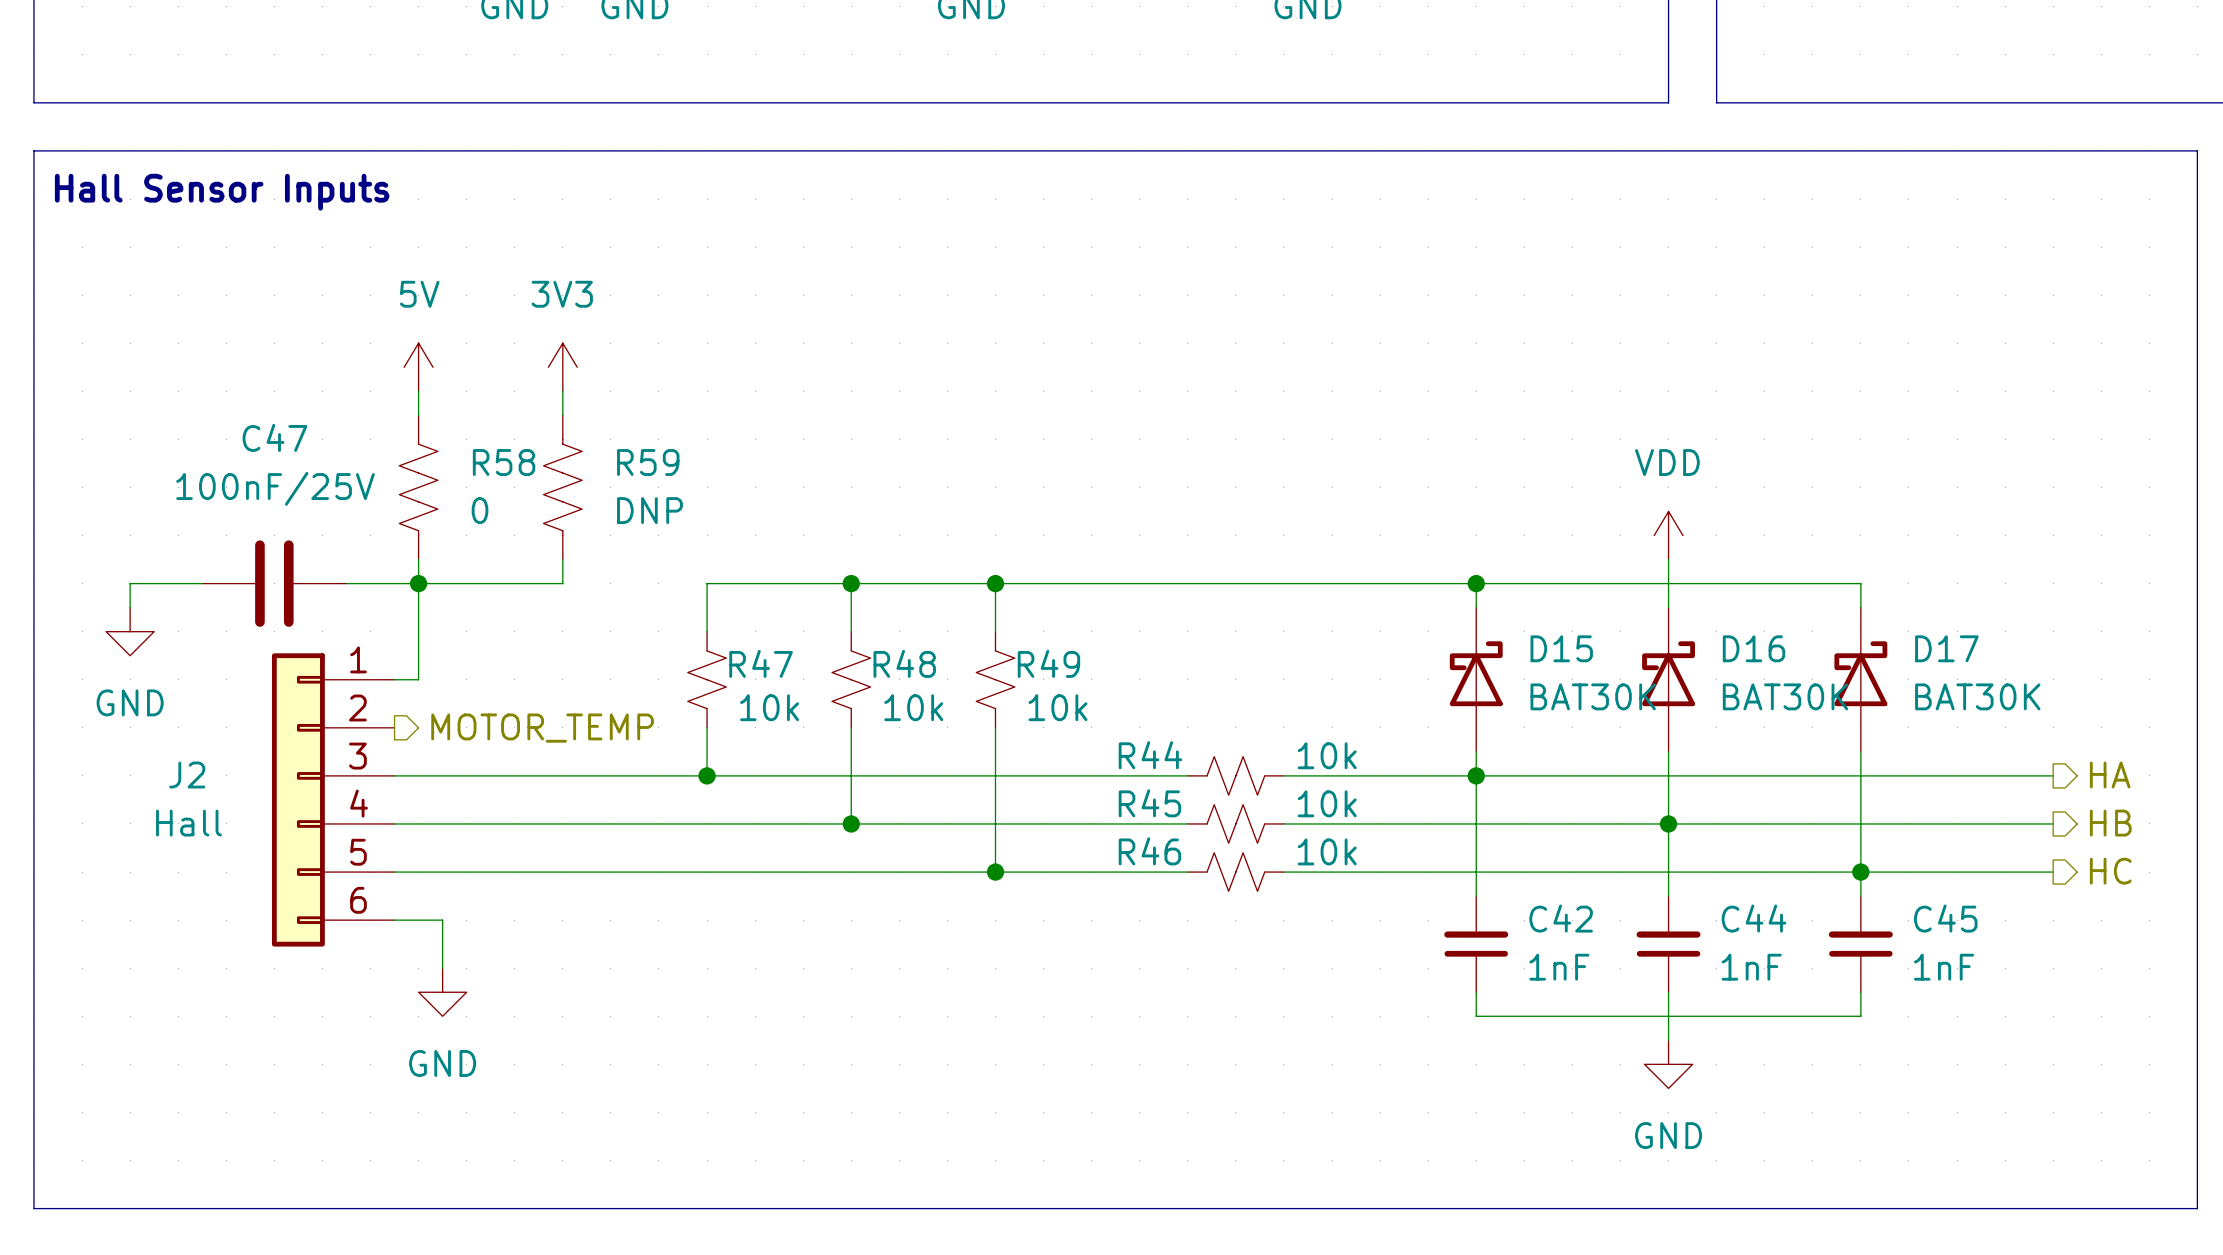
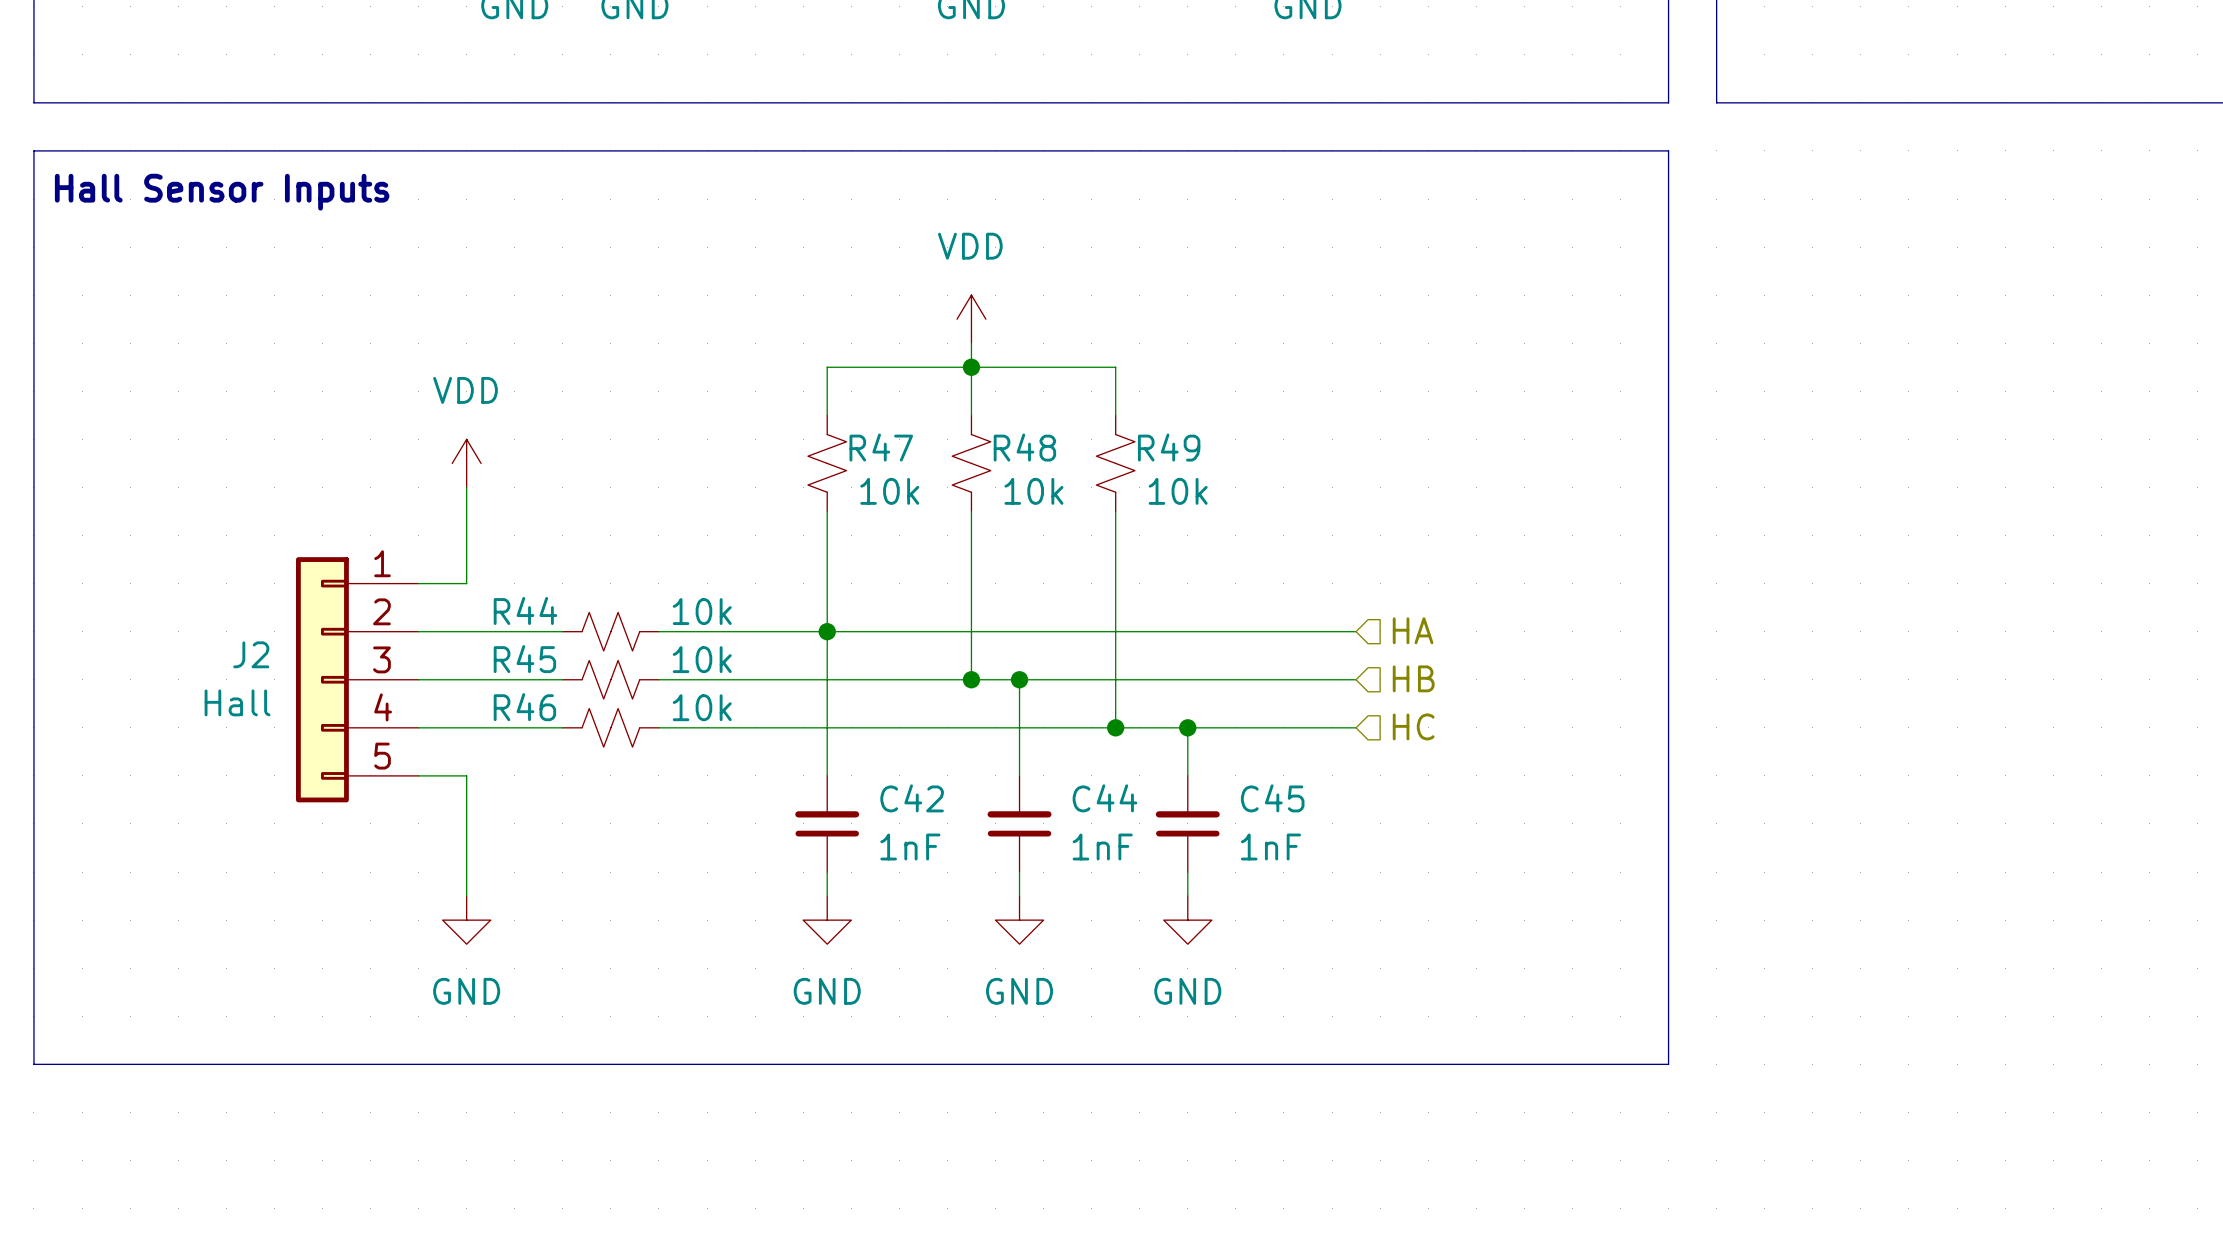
line: (1668, 150) (2197, 150) (2197, 1208) (33, 1208) (33, 1064) -> (1668, 150) (1668, 1064) (33, 1064)
power symbol: none -> VDD (971, 319)
wire: none -> (971, 343) (971, 415)
power symbol: 5V (418, 367) -> none
power symbol: 3V3 (562, 367) -> none
junction: none -> (971, 367)
wire: (418, 391) (418, 415) -> none
wire: (562, 391) (562, 415) -> none
wire: none -> (827, 415) (827, 367) (1115, 367) (1115, 415)
power symbol: none -> VDD (466, 463)
R58: 0 (418, 487) -> none
R59: DNP (562, 487) -> none
wire: none -> (827, 511) (827, 775)
wire: none -> (971, 511) (971, 679)
wire: none -> (1115, 511) (1115, 727)
power symbol: VDD (1668, 535) -> none
wire: (418, 559) (418, 679) (394, 679) -> none
wire: (562, 559) (562, 583) (466, 583) -> (466, 487) (466, 583)
wire: (202, 583) (130, 583) (130, 607) -> none
C47: 100nF/25V (274, 583) -> none
junction: (418, 583) -> none
wire: (851, 583) (851, 631) -> none
junction position: (851, 583) -> (827, 631)
wire: (995, 583) (995, 631) -> none
junction: (995, 583) -> none
wire: (1476, 583) (1476, 607) -> none
junction: (1476, 583) -> none
wire: (1860, 607) (1860, 583) (707, 583) (707, 631) -> none
hierarchical label: none -> HA (1413, 630)
power symbol: GND (130, 631) -> none
wire: none -> (418, 631) (562, 631)
wire: none -> (658, 631) (1356, 631)
J2 symbol: [271, 653, 395, 947] -> [295, 557, 419, 803]
hierarchical label: none -> HB (1413, 678)
wire: none -> (418, 679) (562, 679)
wire: none -> (658, 679) (1356, 679)
R47 position: (707, 679) -> (827, 463)
R48 position: (851, 679) -> (971, 463)
junction: none -> (971, 679)
R49 position: (995, 679) -> (1115, 463)
junction: none -> (1019, 679)
D15: BAT30K (1476, 679) -> none
D16: BAT30K (1668, 679) -> none
D17: BAT30K (1860, 679) -> none
hierarchical label: none -> HC (1413, 726)
wire: none -> (418, 727) (562, 727)
wire: none -> (658, 727) (1356, 727)
wire: (707, 727) (707, 775) -> none
wire: (851, 727) (851, 823) -> (1019, 679) (1019, 775)
wire: (995, 727) (995, 872) -> none
junction: none -> (1115, 727)
junction: none -> (1187, 727)
hierarchical label: MOTOR_TEMP (542, 728) -> none
wire: (1476, 751) (1476, 896) -> none
wire: (1860, 751) (1860, 896) -> none
wire: (466, 775) (1187, 775) -> (1187, 727) (1187, 775)
wire: none -> (466, 775) (466, 896)
junction: (707, 775) -> none
R44 position: (1235, 775) -> (610, 631)
wire: (1283, 775) (2053, 775) -> none
junction: (1476, 775) -> none
hierarchical label: HA (2110, 775) -> none
wire: (394, 823) (1187, 823) -> none
junction: (851, 823) -> none
R45 position: (1235, 823) -> (610, 679)
wire: (1283, 823) (2053, 823) -> none
junction: (1668, 823) -> none
hierarchical label: HB (2110, 823) -> none
hierarchical label: HC (2110, 871) -> none
wire: (394, 872) (1187, 872) -> (1187, 896) (1187, 872)
wire: none -> (827, 872) (827, 896)
junction: (995, 872) -> none
wire: none -> (1019, 872) (1019, 896)
R46 position: (1235, 872) -> (610, 727)
wire: (1283, 872) (2053, 872) -> none
junction: (1860, 872) -> none
wire: (394, 920) (442, 920) (442, 968) -> none
power symbol: none -> GND (827, 920)
power symbol: none -> GND (1019, 920)
power symbol: none -> GND (1187, 920)
C42 position: (1476, 944) -> (827, 823)
C44 position: (1668, 944) -> (1019, 823)
C45 position: (1860, 944) -> (1187, 823)
power symbol position: GND (442, 992) -> GND (466, 920)
wire: (1476, 992) (1476, 1016) (1860, 1016) (1860, 992) -> none
power symbol: GND (1668, 1064) -> none

